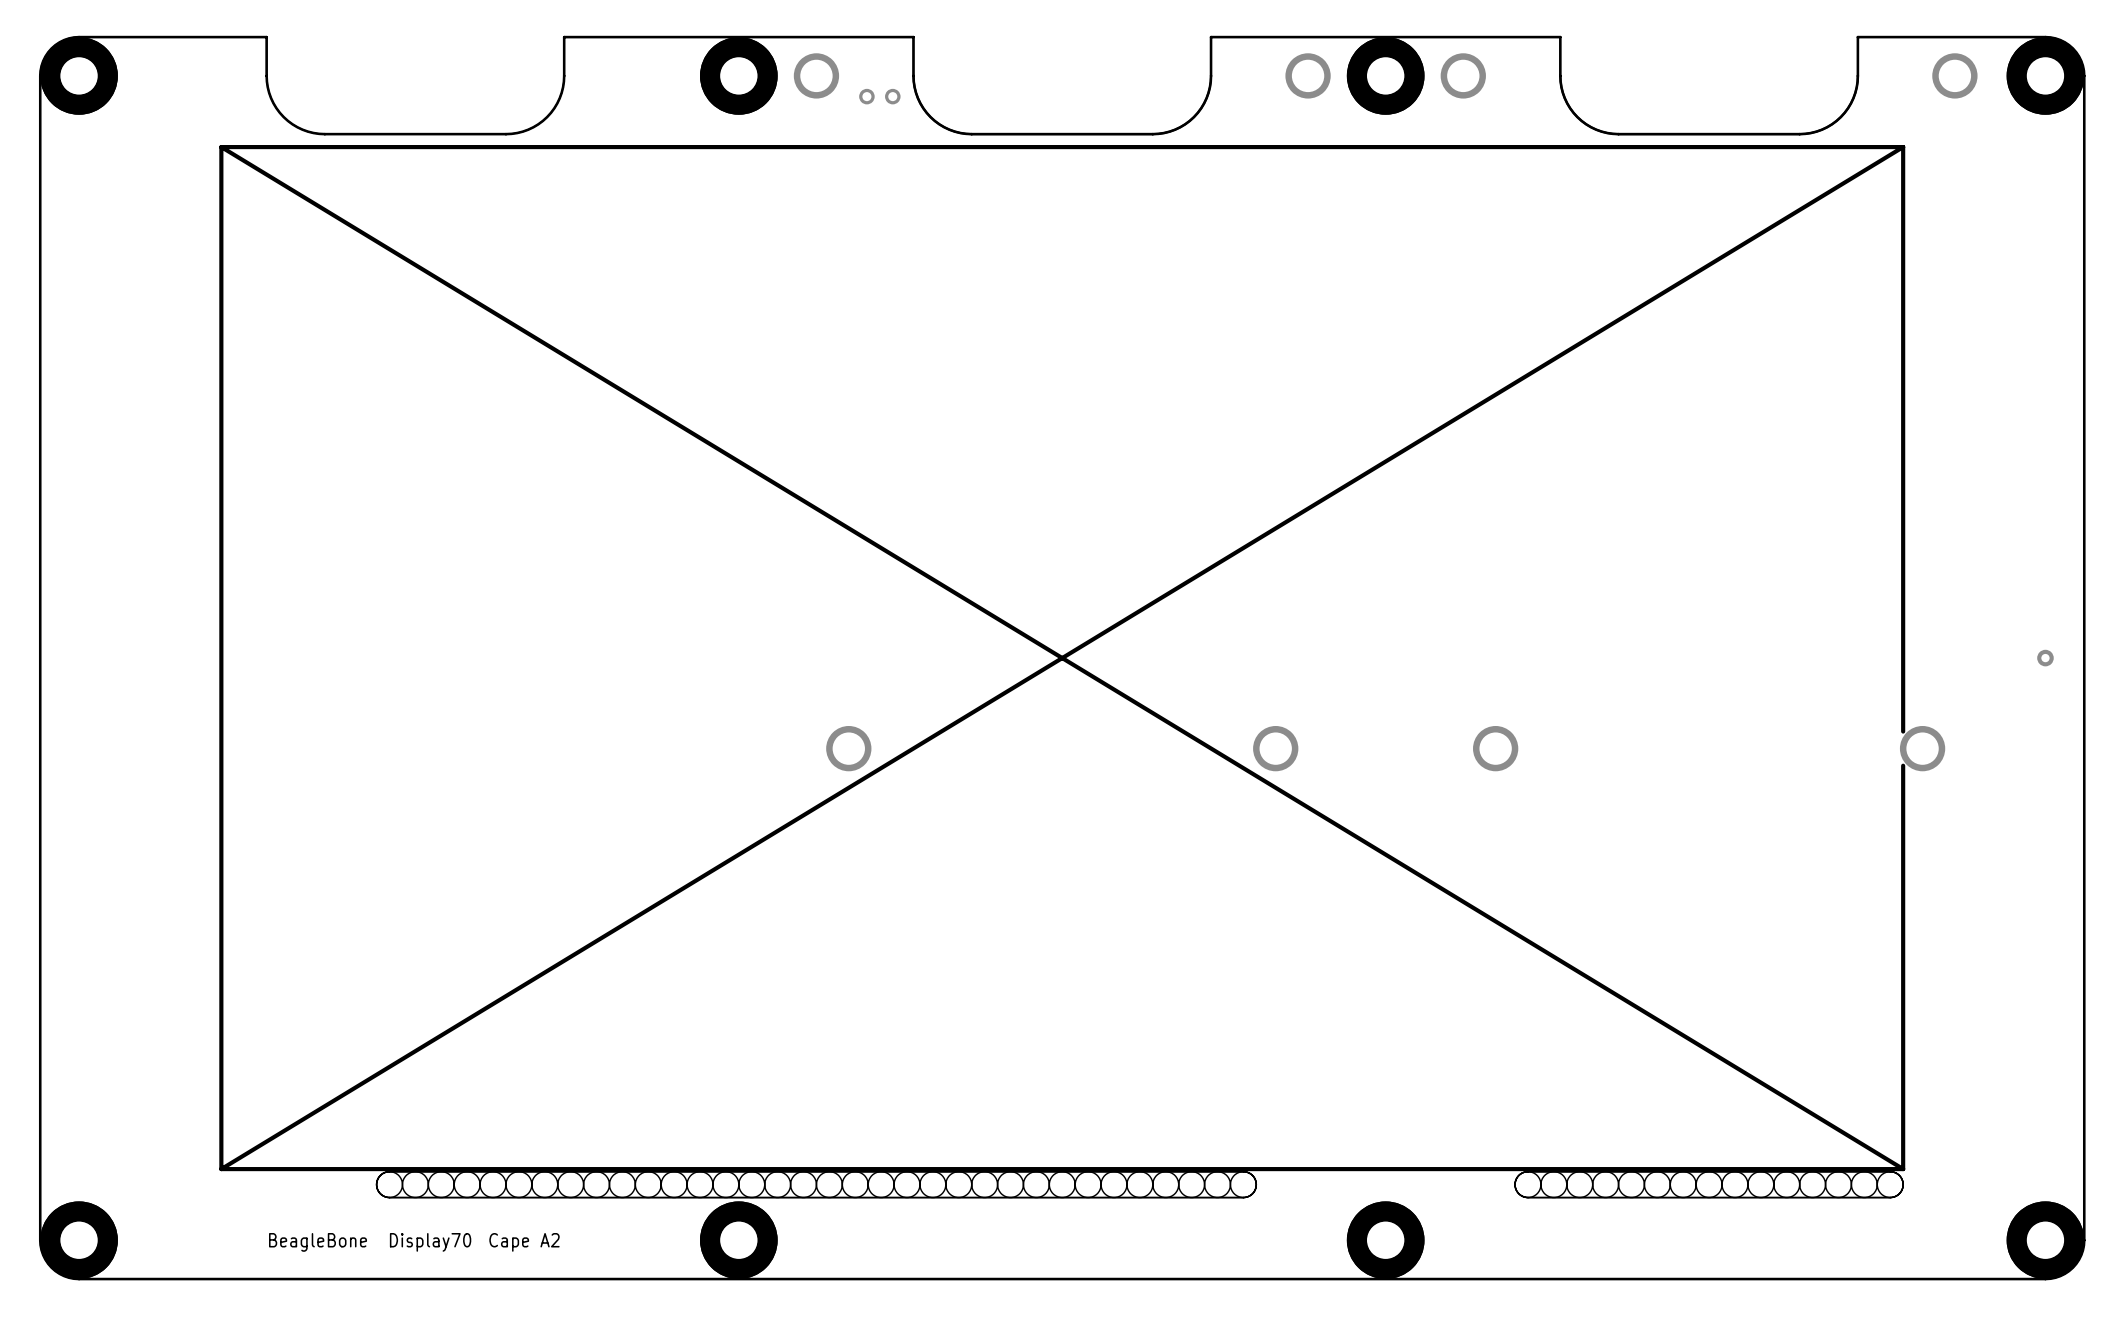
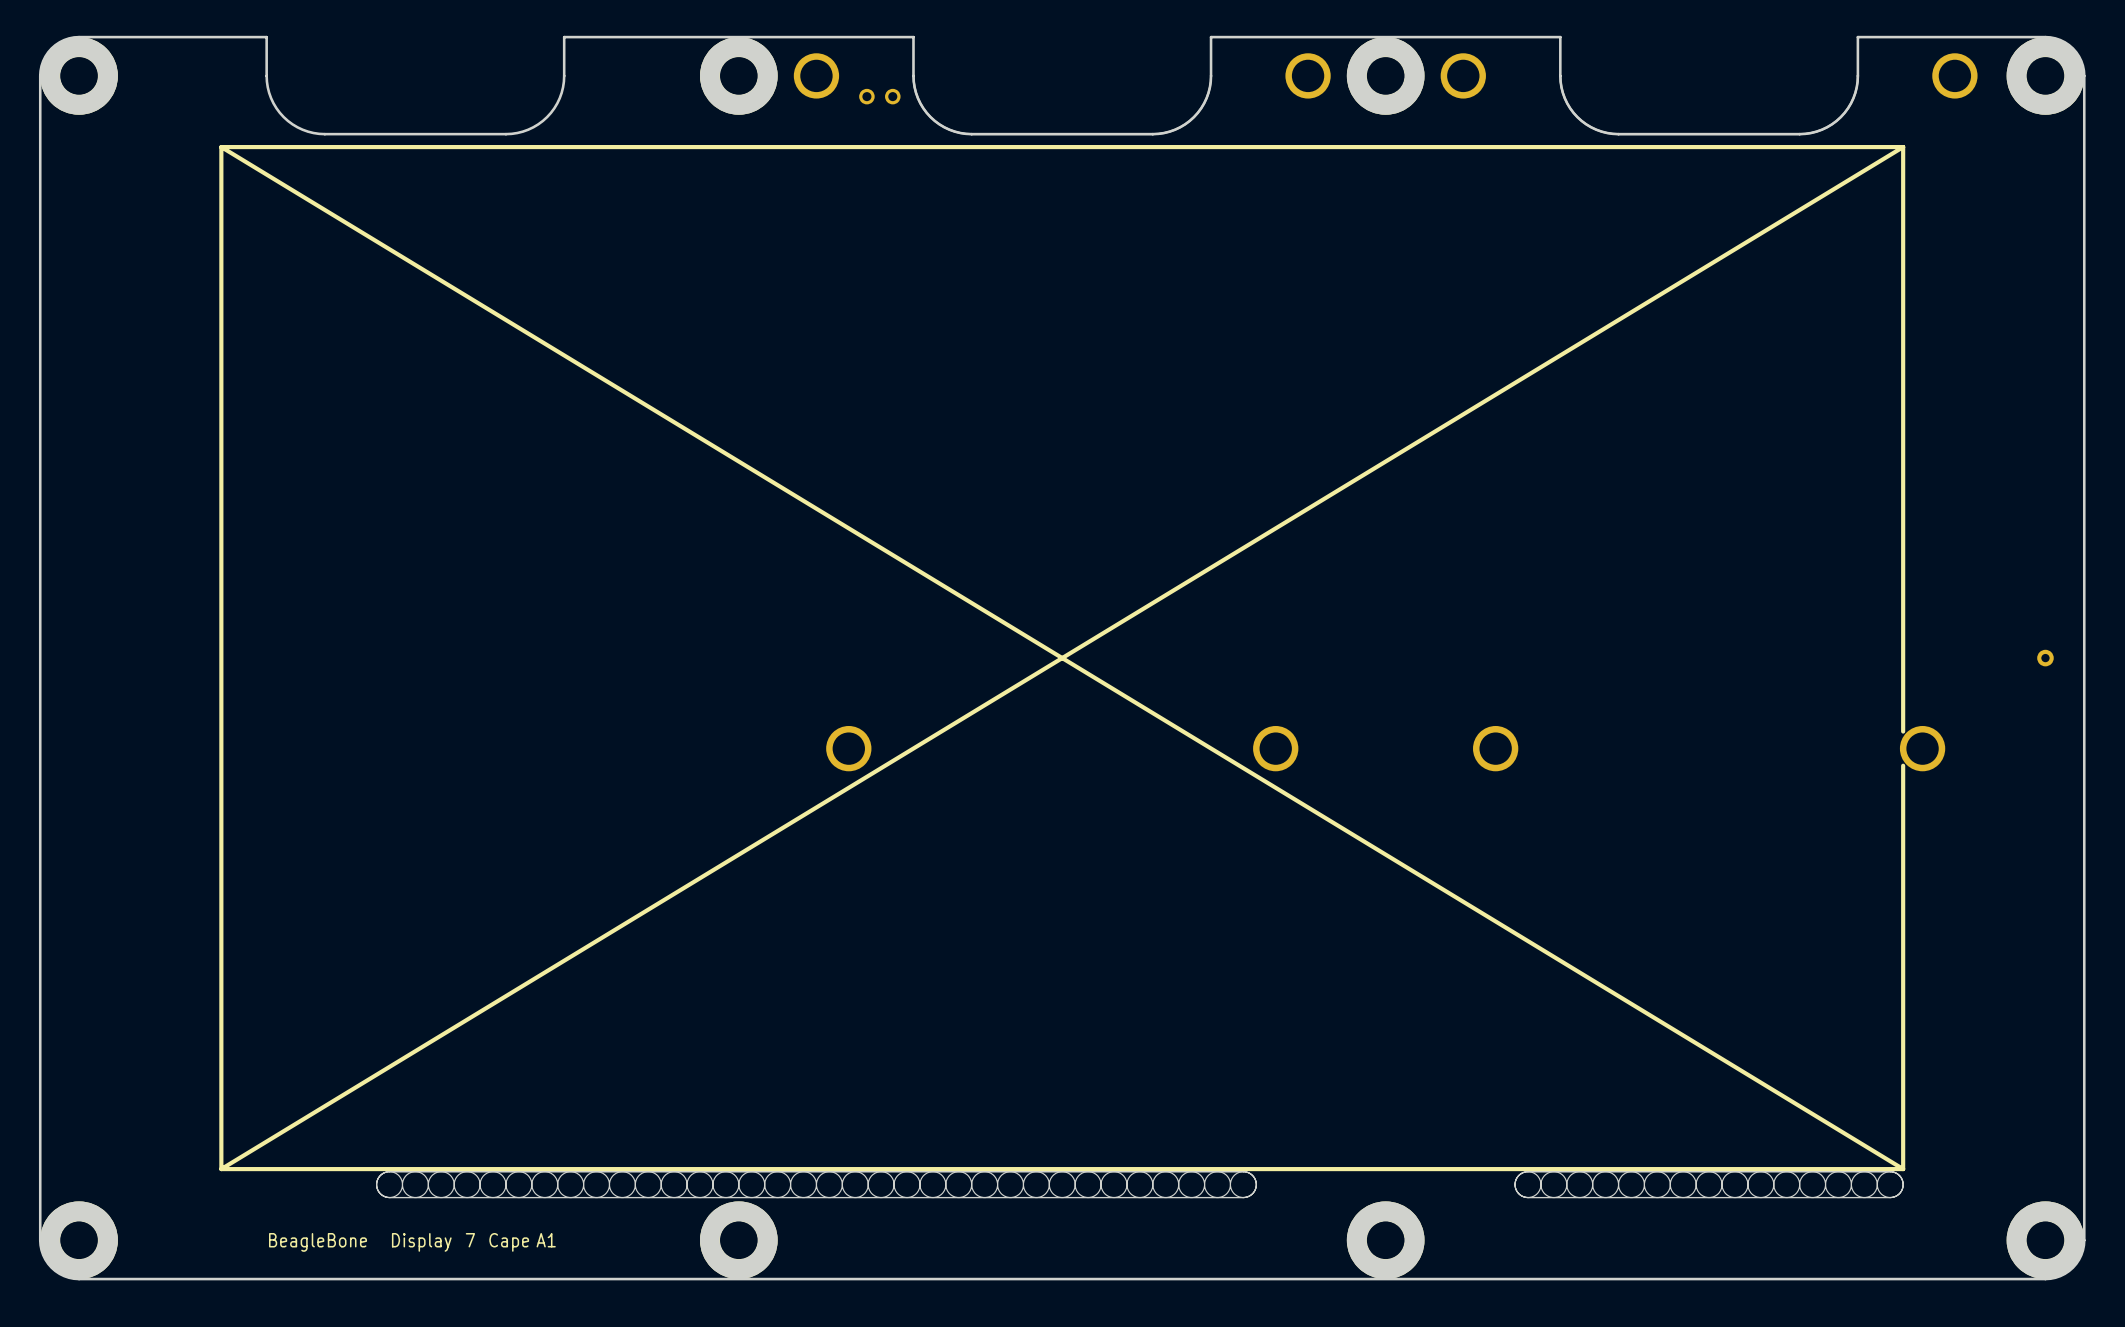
text: none -> 7 (470, 1240)
text: A2 (550, 1240) -> A1 (546, 1240)
text: Display70 (430, 1242) -> Display (421, 1242)

